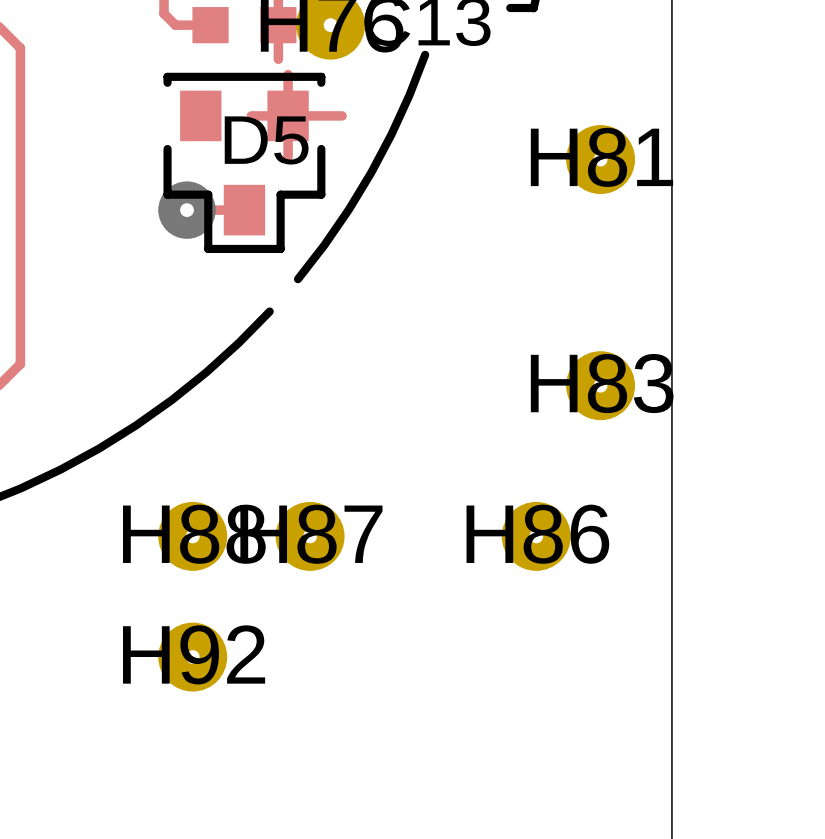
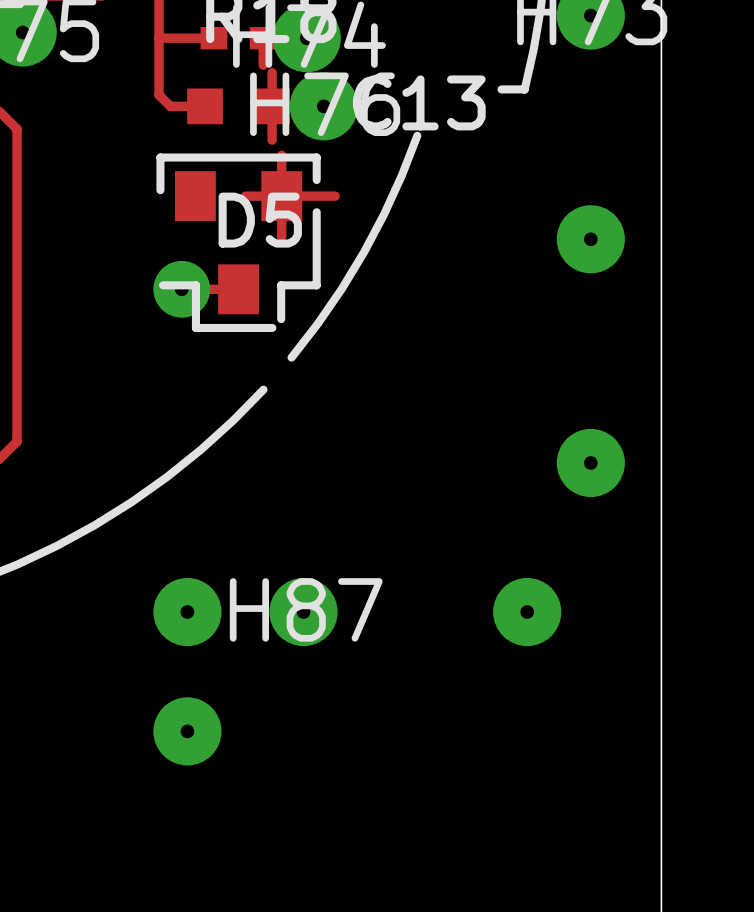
D5 footprint: [163, 72, 326, 254] -> [156, 153, 321, 332]
H81 name: H81 (601, 157) -> none
H83 name: H83 (602, 383) -> none
H88 name: H88 (194, 534) -> none
H86 name: H86 (537, 534) -> none
H92 name: H92 (194, 654) -> none

